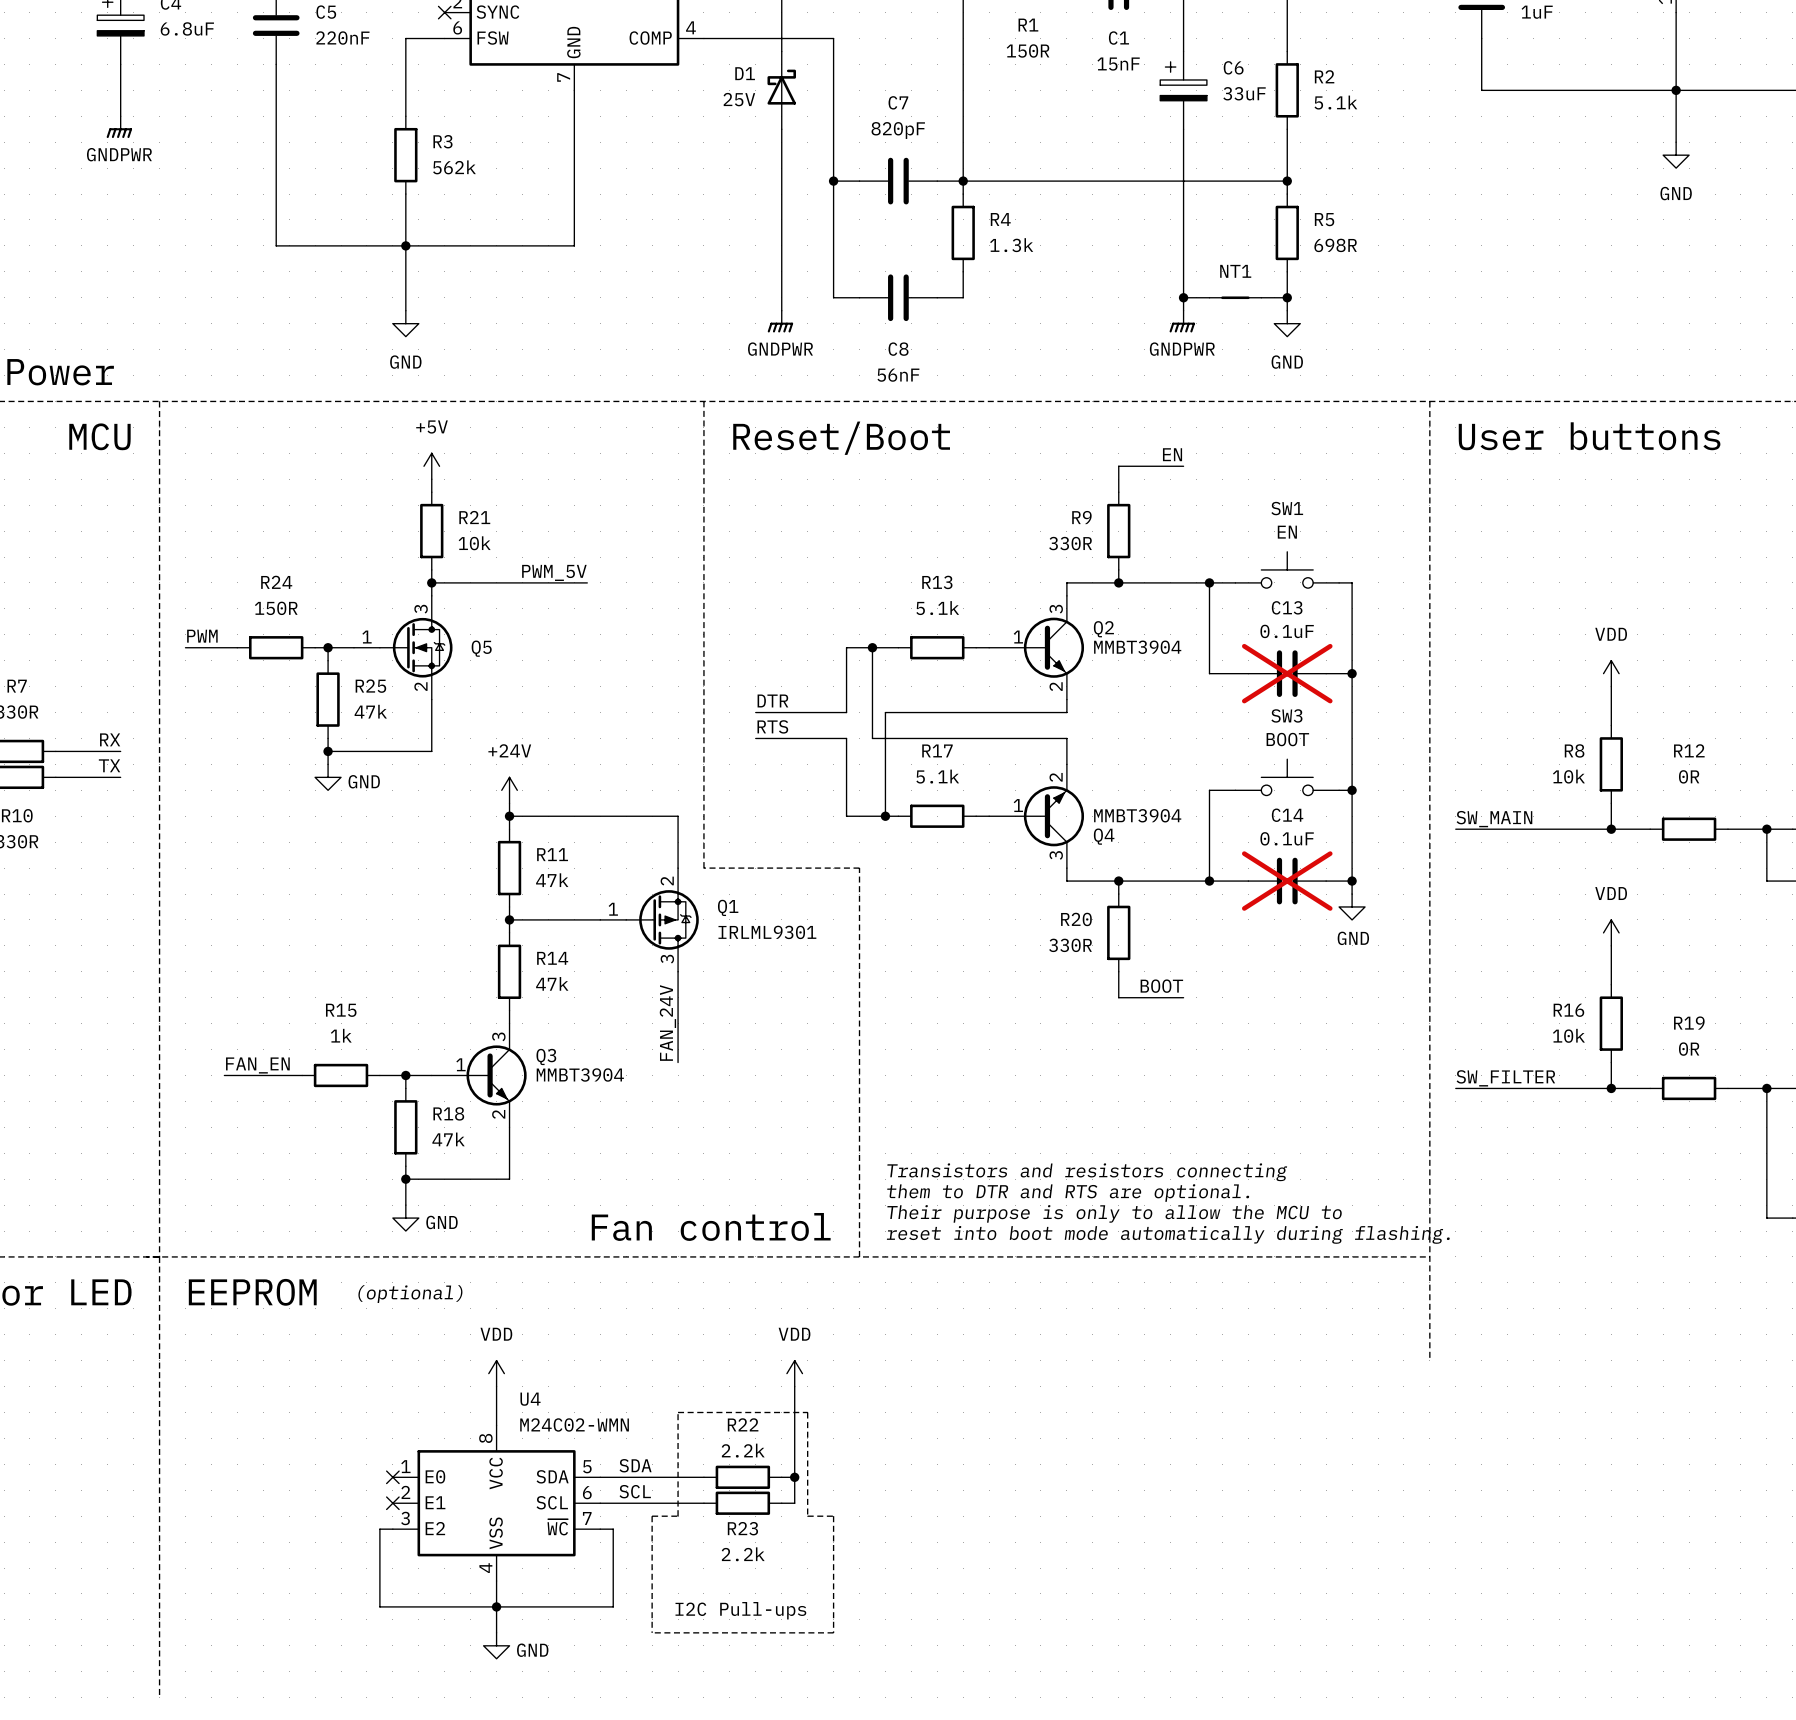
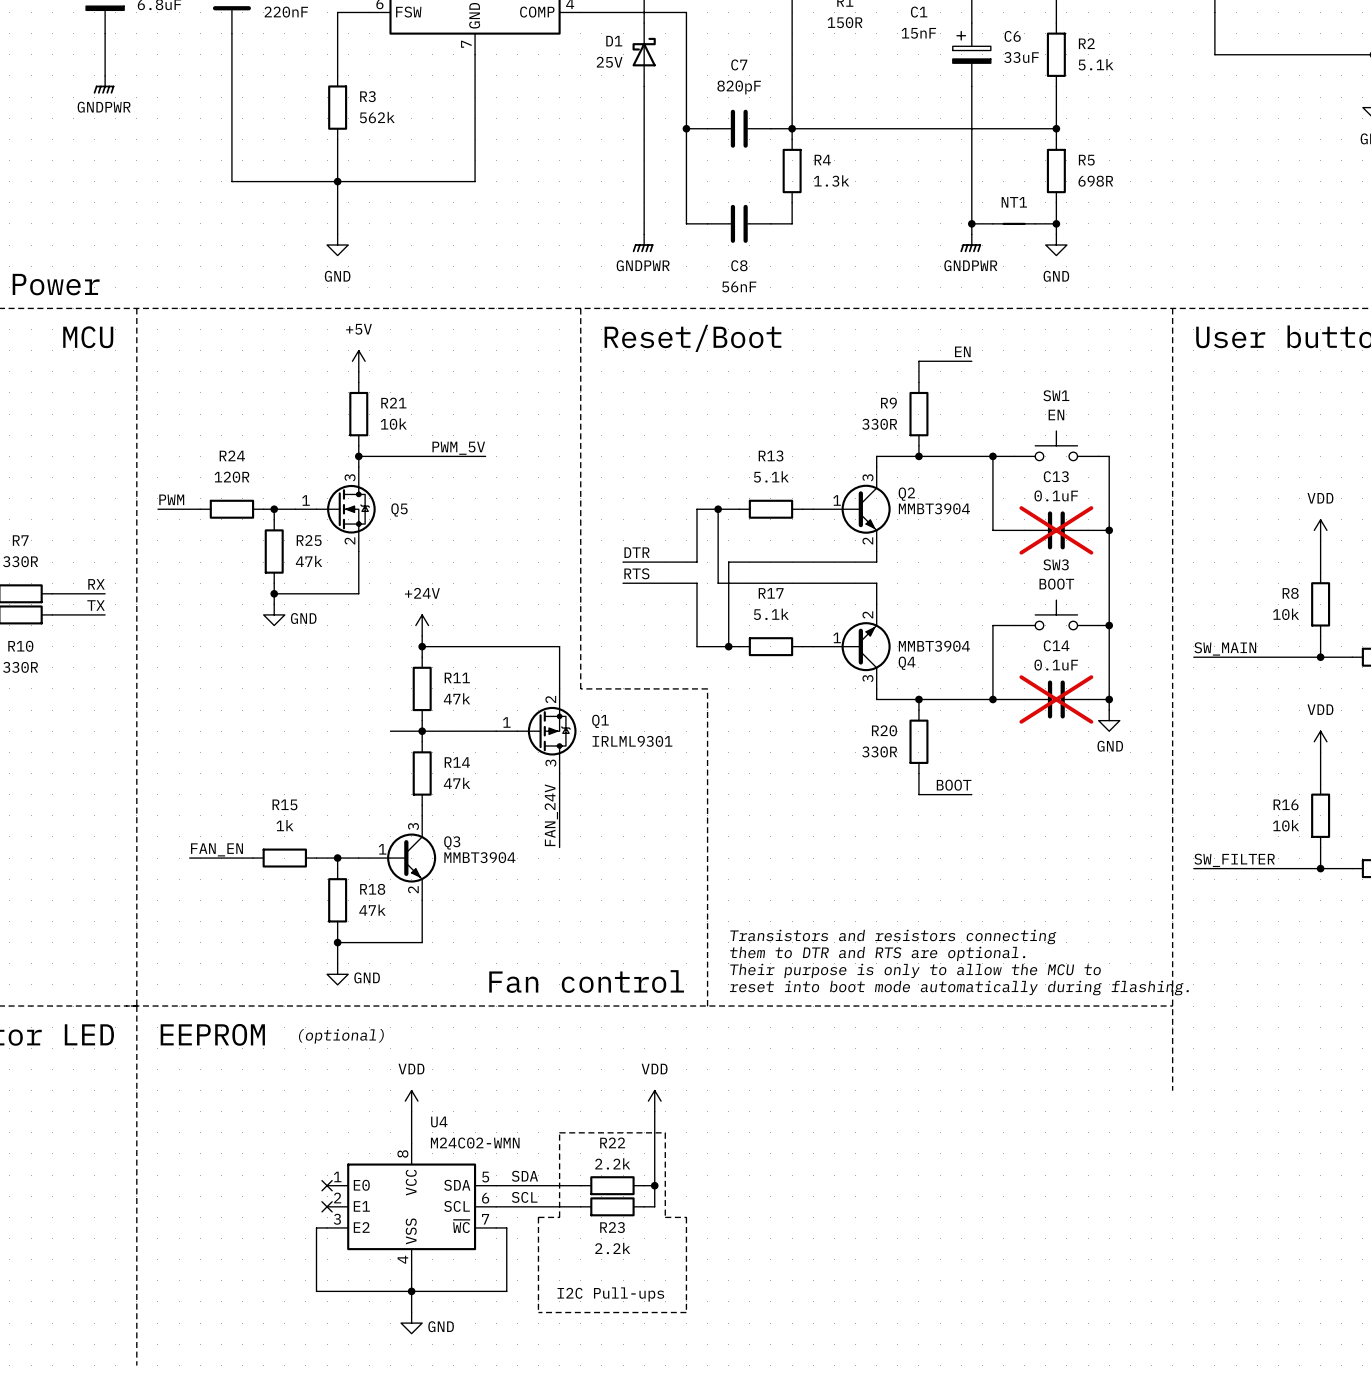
R24 value: 150R (276, 608) -> 120R (231, 477)
wire: none -> (390, 731) (422, 731)

